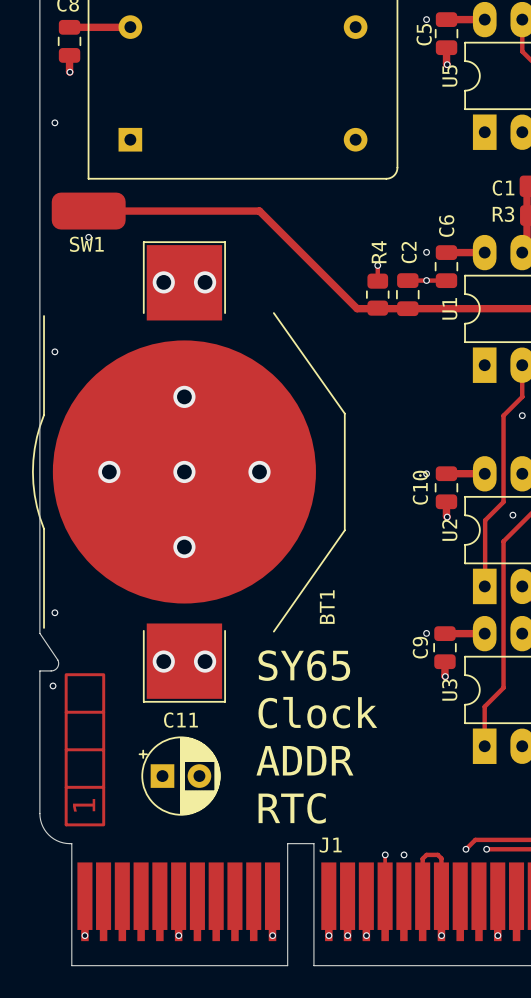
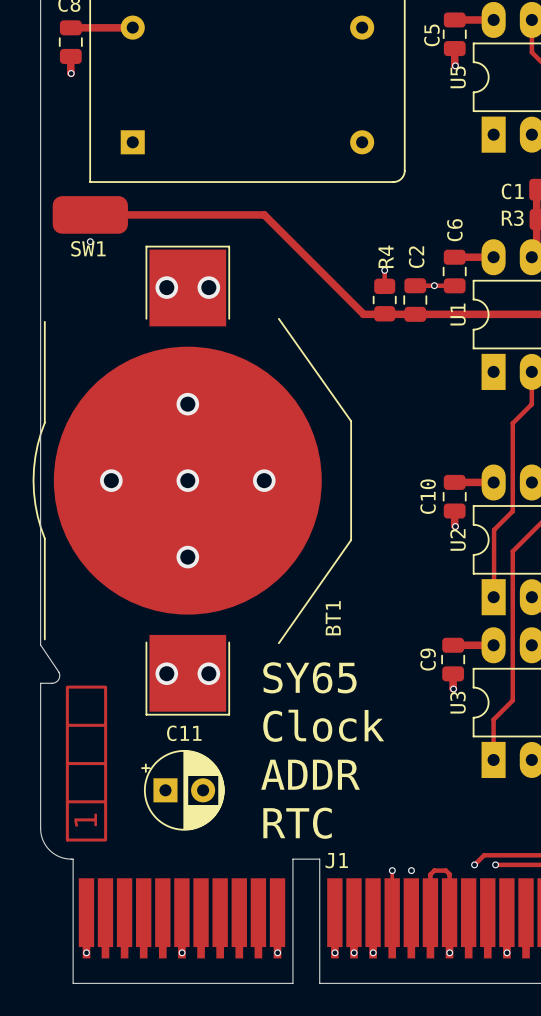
via: (426, 19) -> none
via: (54, 122) -> none
via: (426, 252) -> none
via: (54, 351) -> none
via: (522, 415) -> none
via: (426, 473) -> none
via: (512, 515) -> none
via: (54, 612) -> none
via: (426, 633) -> none
via: (53, 685) -> none

